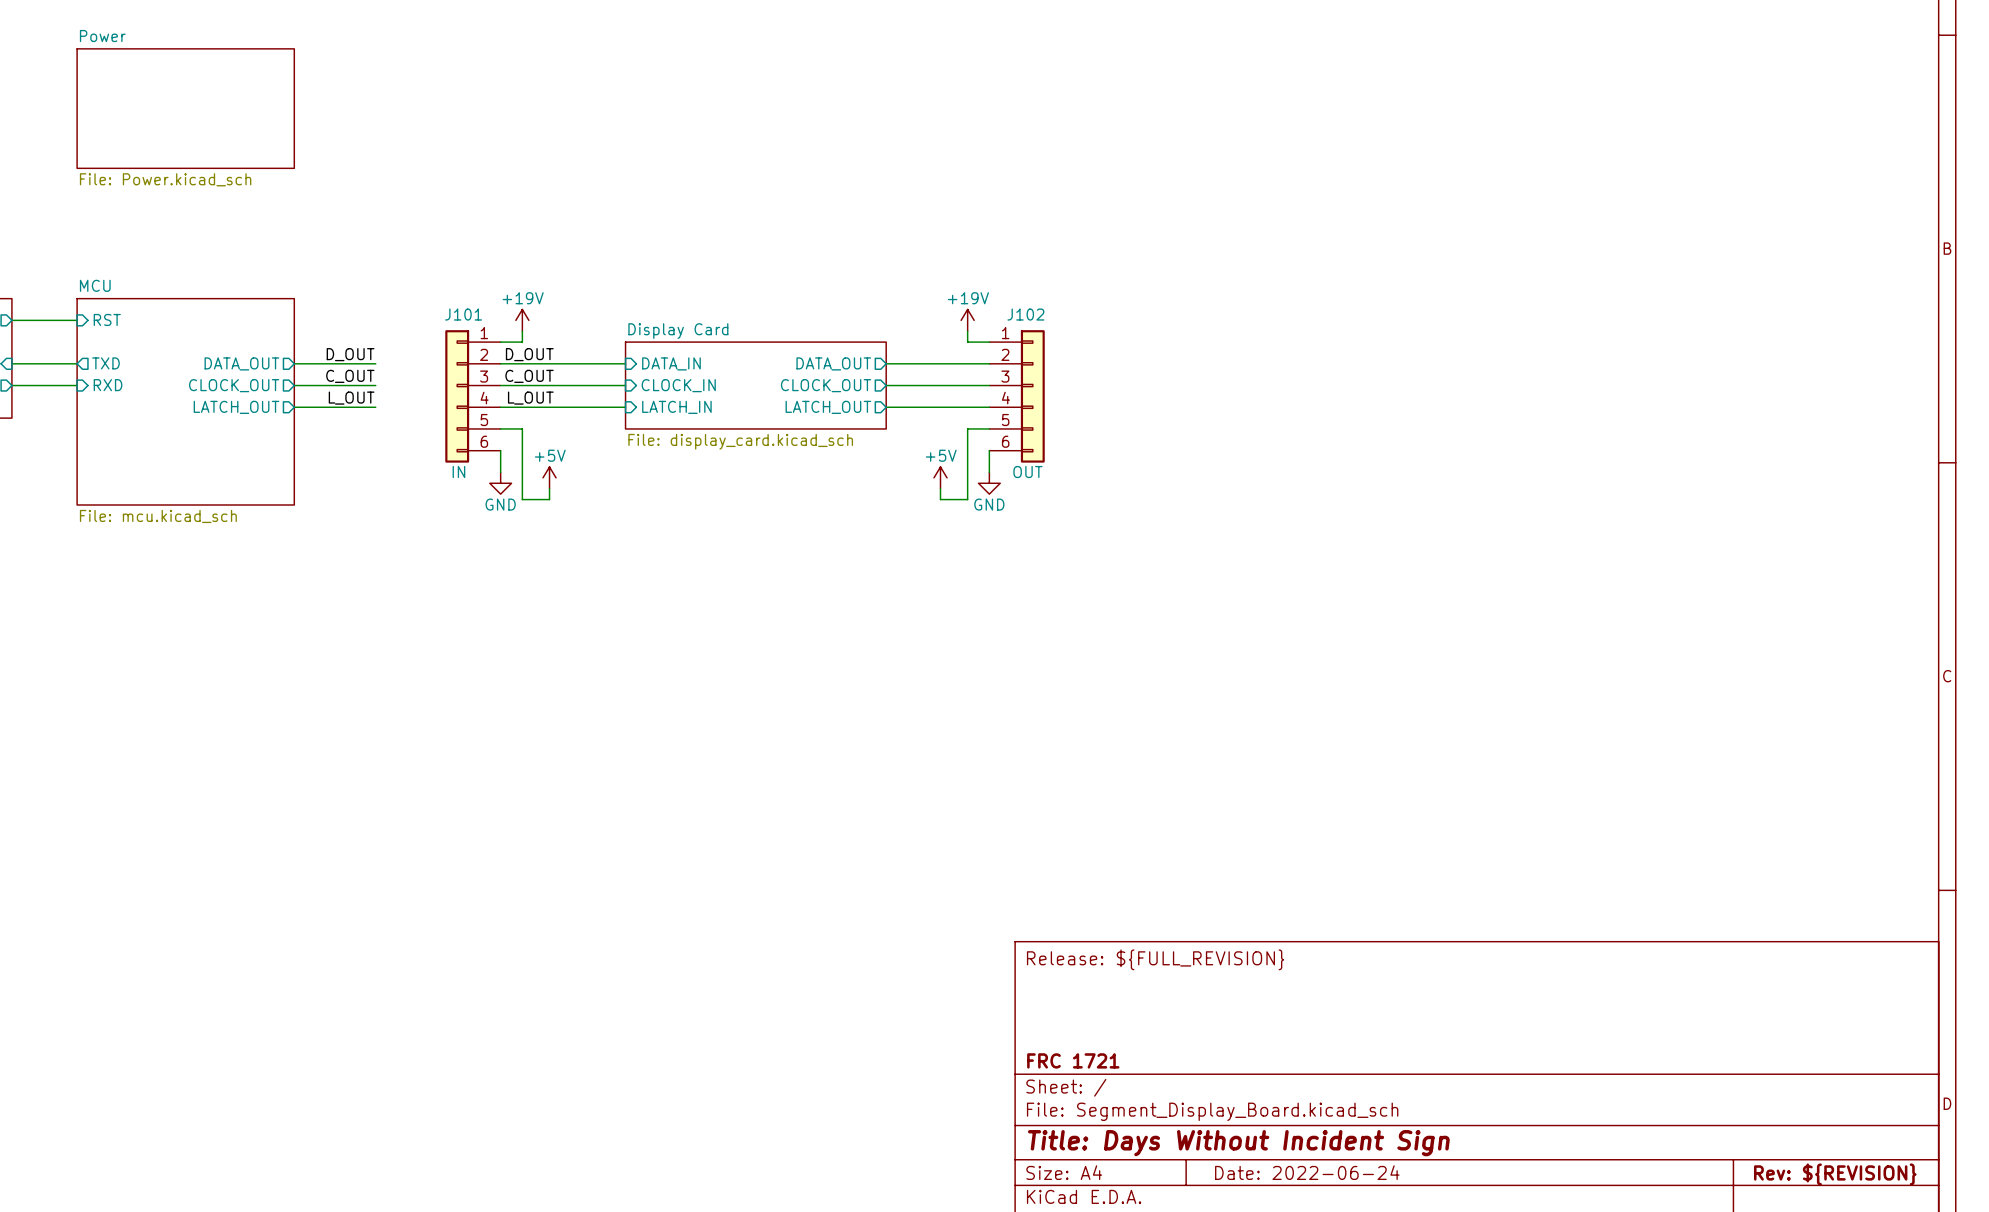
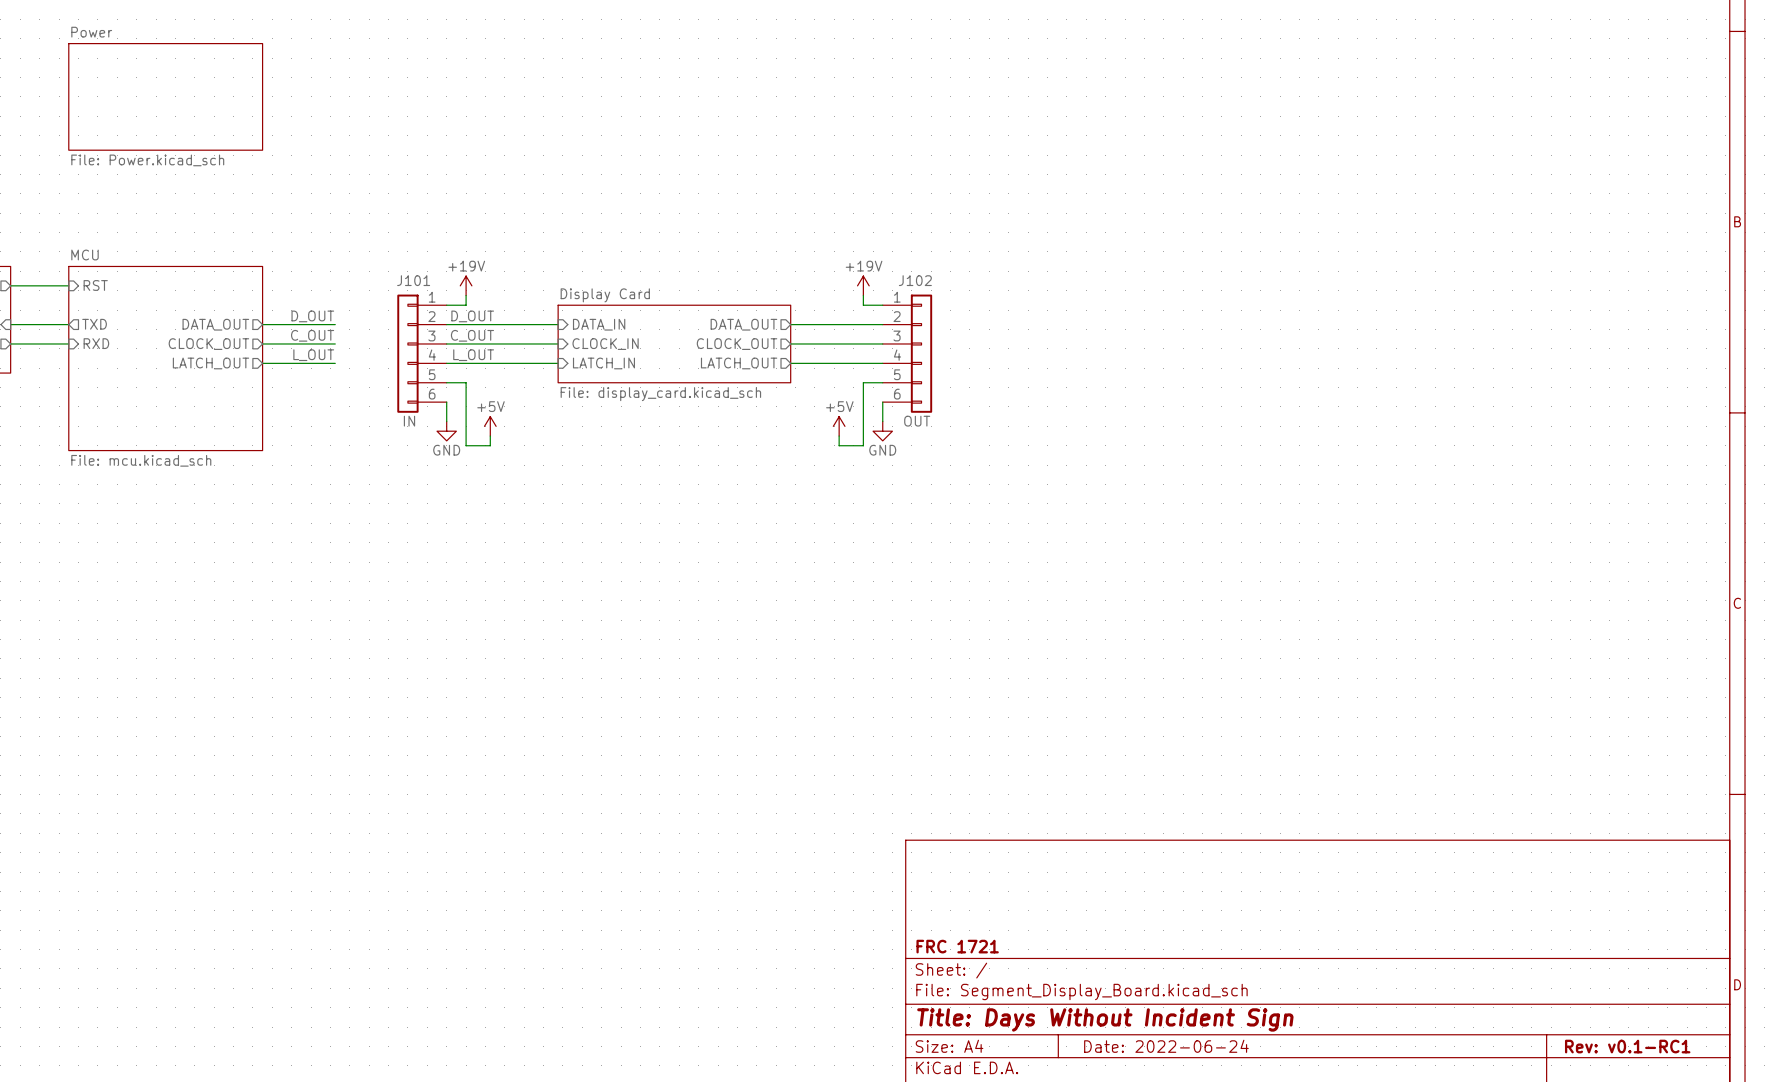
title block: Release: ${FULL_REVISION} (1155, 959) -> none
title block: Rev: ${REVISION} (1835, 1174) -> Rev: v0.1-RC1 (1627, 1046)

